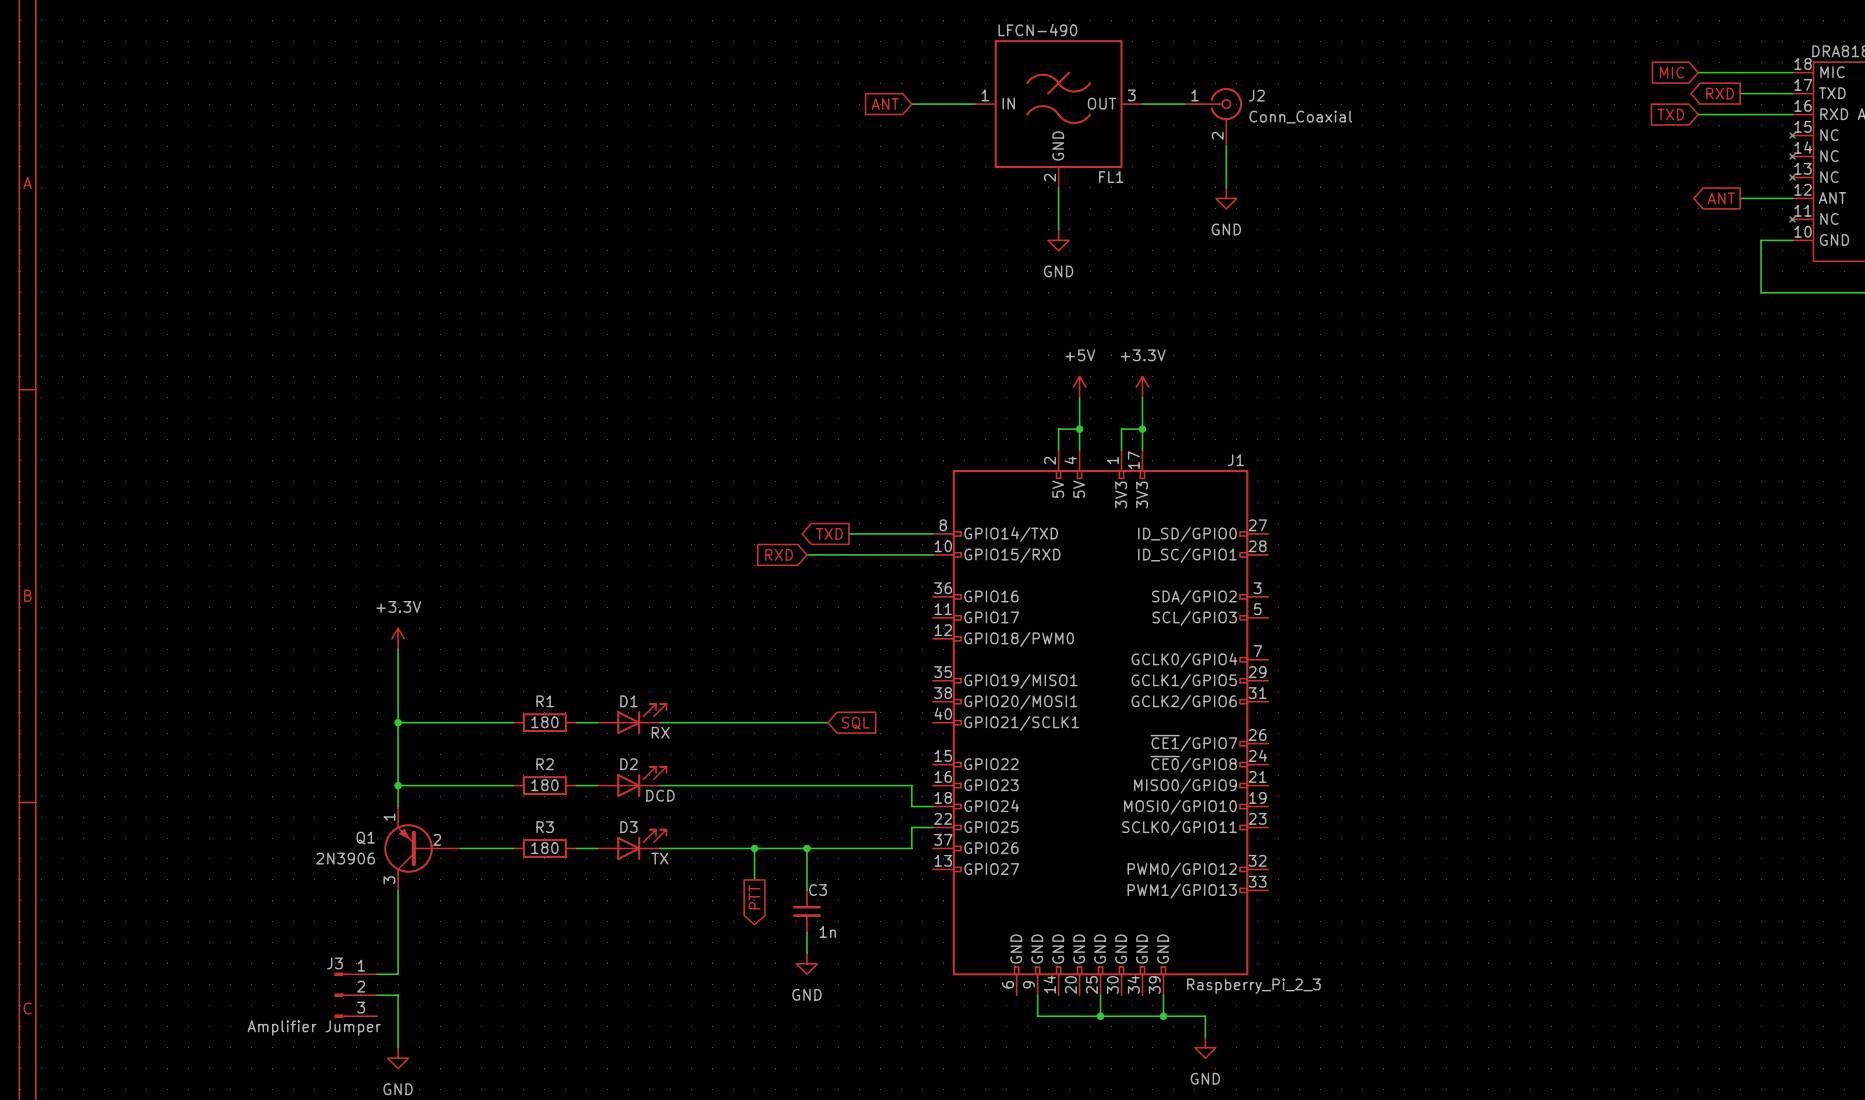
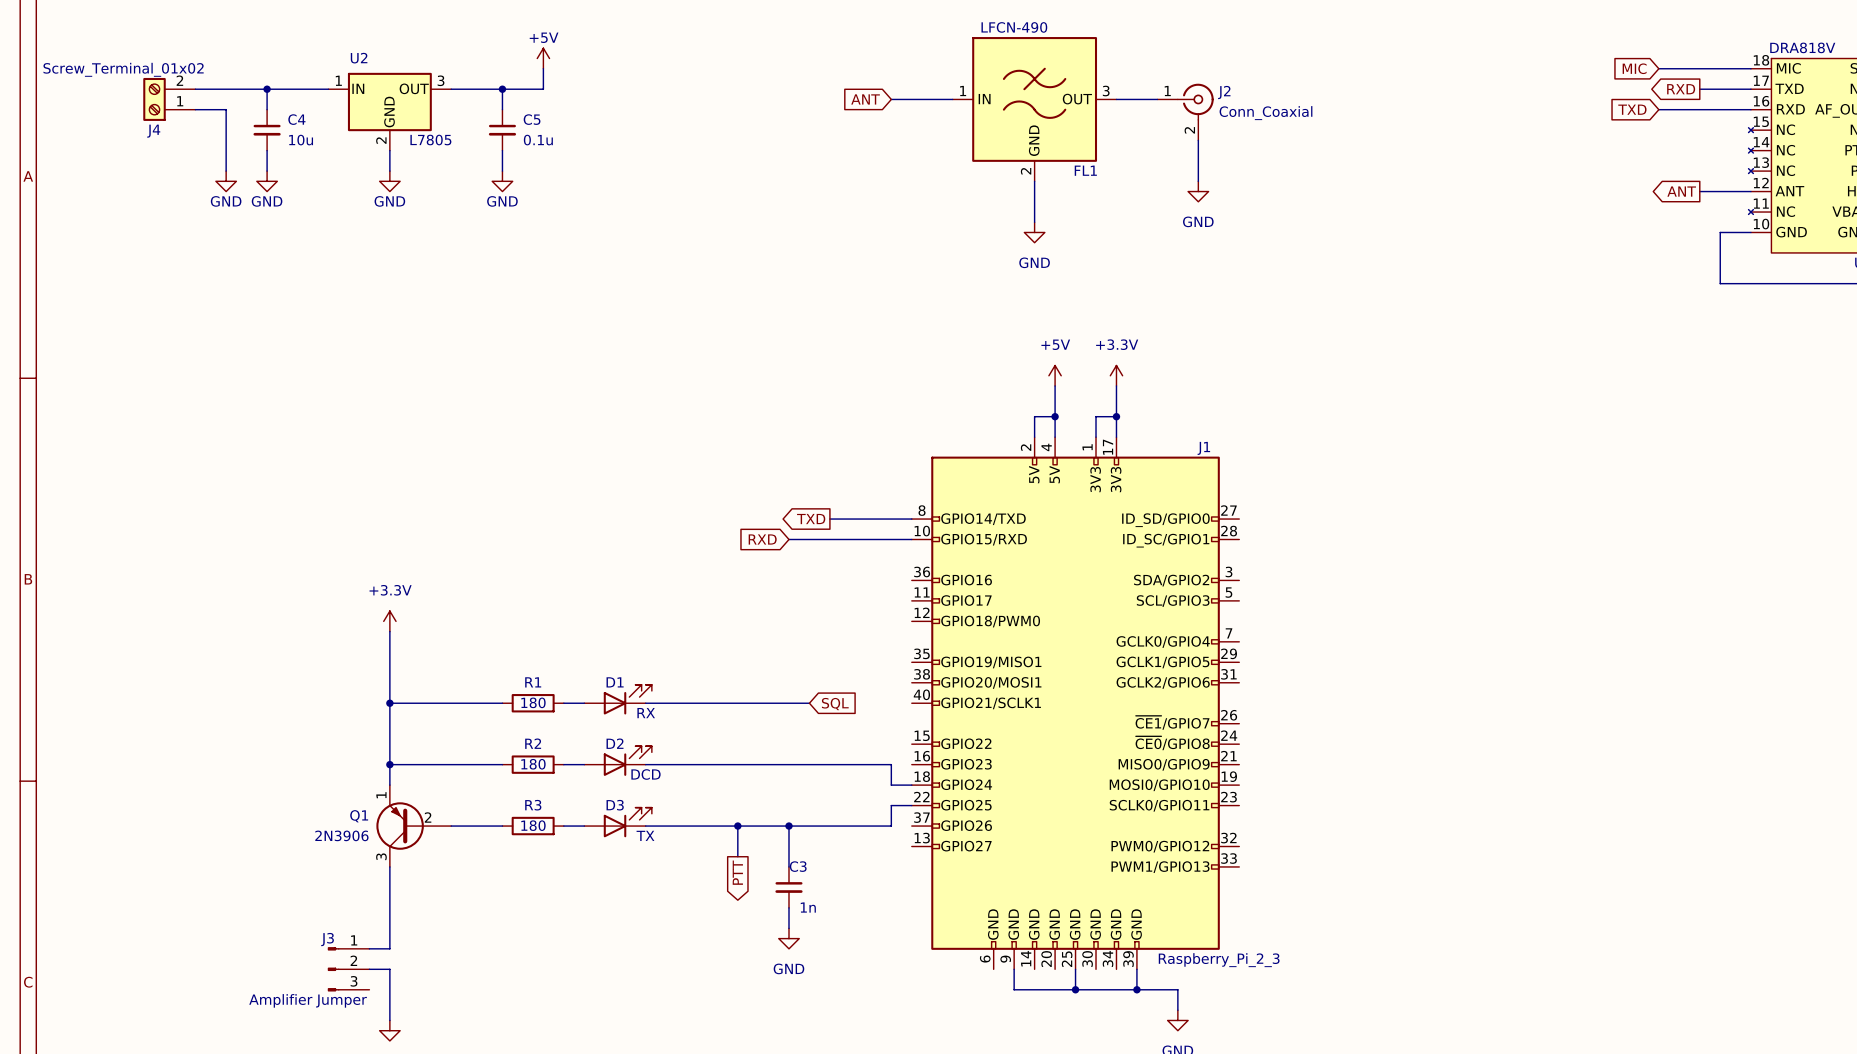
power symbol: none -> +5V (543, 58)
wire: none -> (543, 68) (543, 89) (451, 89)
wire: none -> (195, 89) (328, 89)
wire: none -> (267, 89) (267, 109)
junction: none -> (267, 89)
wire: none -> (502, 89) (502, 109)
junction: none -> (502, 89)
J4: none -> Screw_Terminal_01x02 (169, 99)
wire: none -> (195, 109) (226, 109) (226, 171)
U2: none -> L7805 (389, 111)
C4: none -> 10u (267, 130)
C5: none -> 0.1u (502, 130)
wire: none -> (267, 150) (267, 171)
wire: none -> (389, 150) (389, 171)
wire: none -> (502, 150) (502, 171)
power symbol: none -> GND (226, 181)
power symbol: none -> GND (267, 181)
power symbol: none -> GND (389, 181)
power symbol: none -> GND (502, 181)

